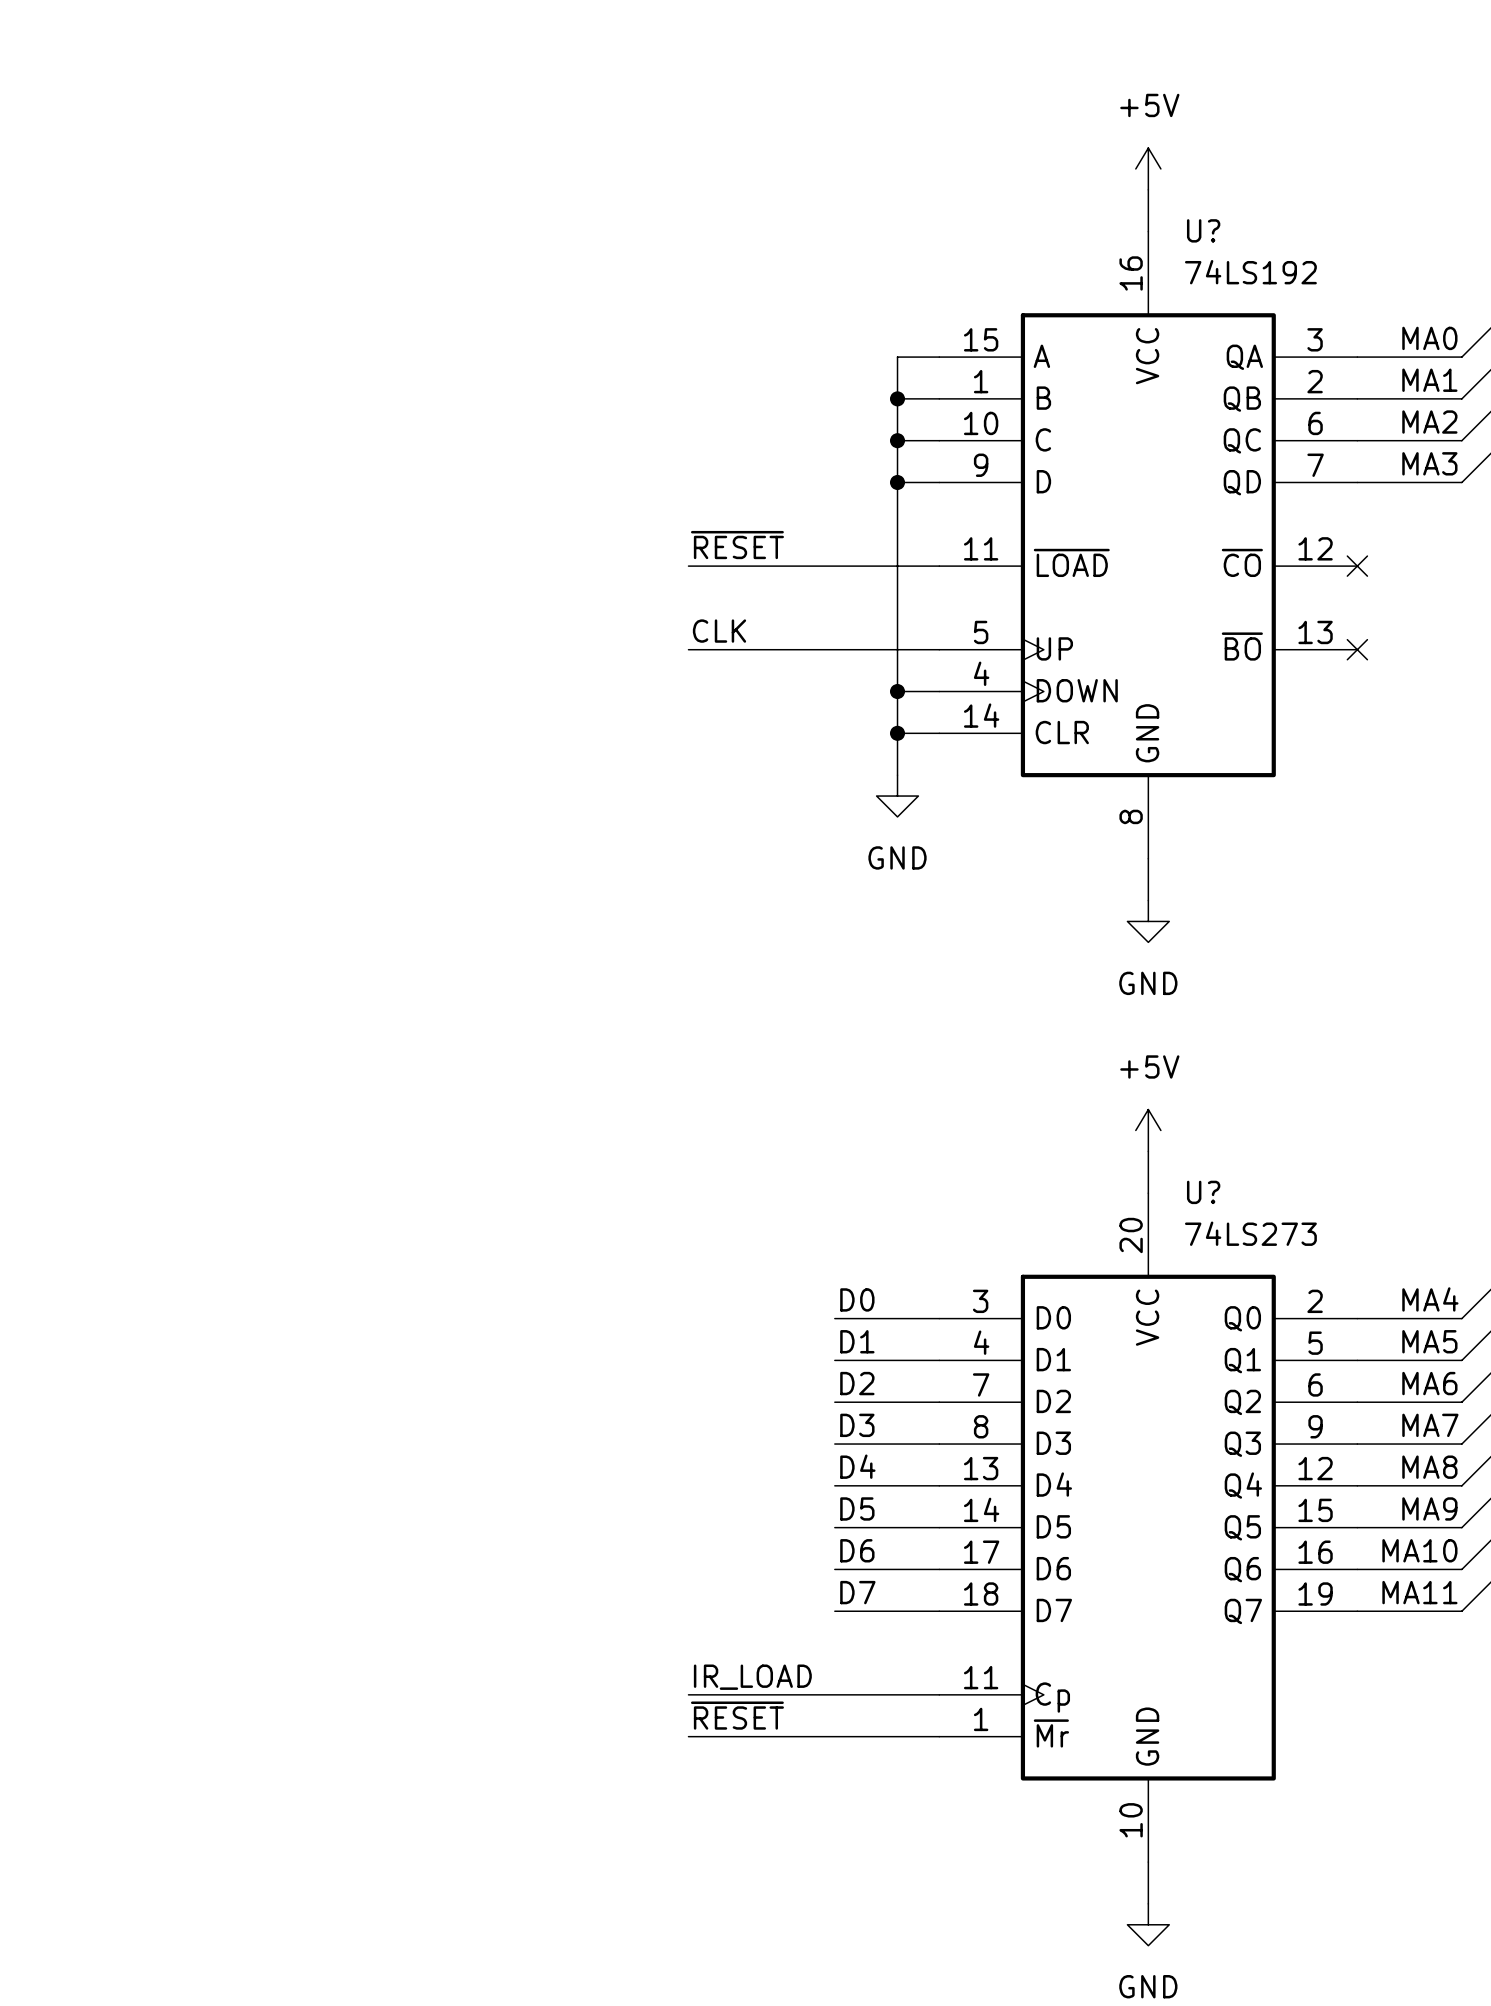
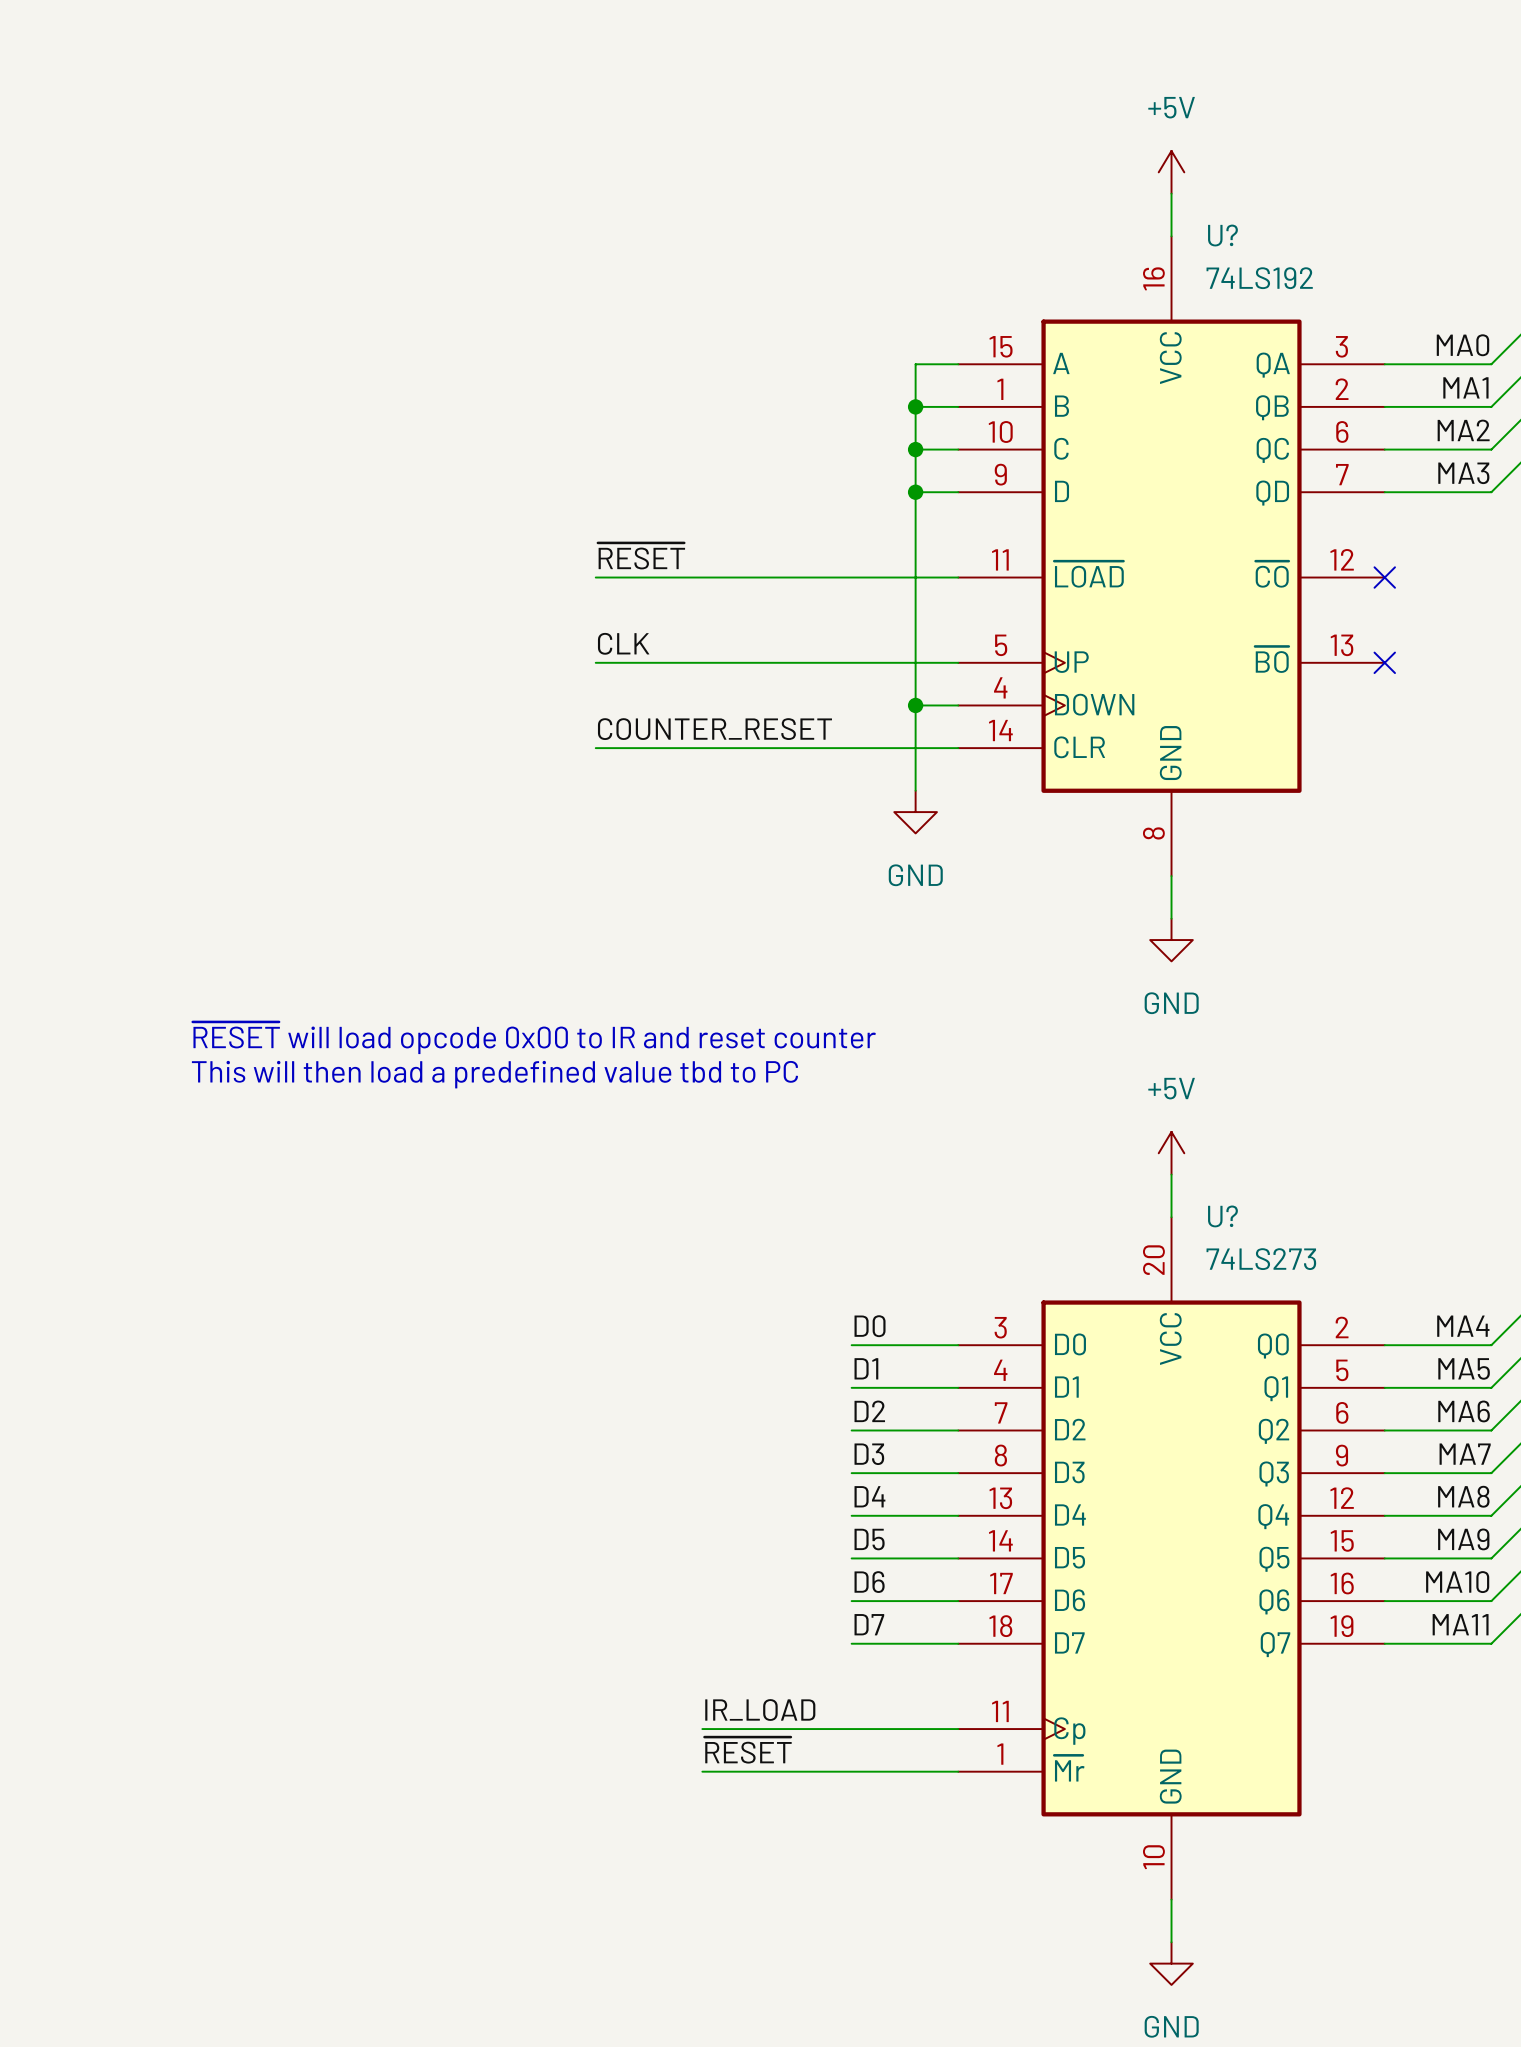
label position: ~{RESET} (737, 545) -> ~{RESET} (641, 556)
wire: none -> (595, 577) (702, 577)
label position: CLK (719, 631) -> CLK (623, 643)
wire: none -> (595, 662) (702, 662)
label: none -> COUNTER_RESET (714, 729)
wire: none -> (595, 748) (915, 748)
junction: (897, 733) -> none
text: none -> ~{RESET} will load opcode 0x00 to IR and reset counter (534, 1038)
text: none -> This will then load a predefined value tbd to PC (494, 1074)

